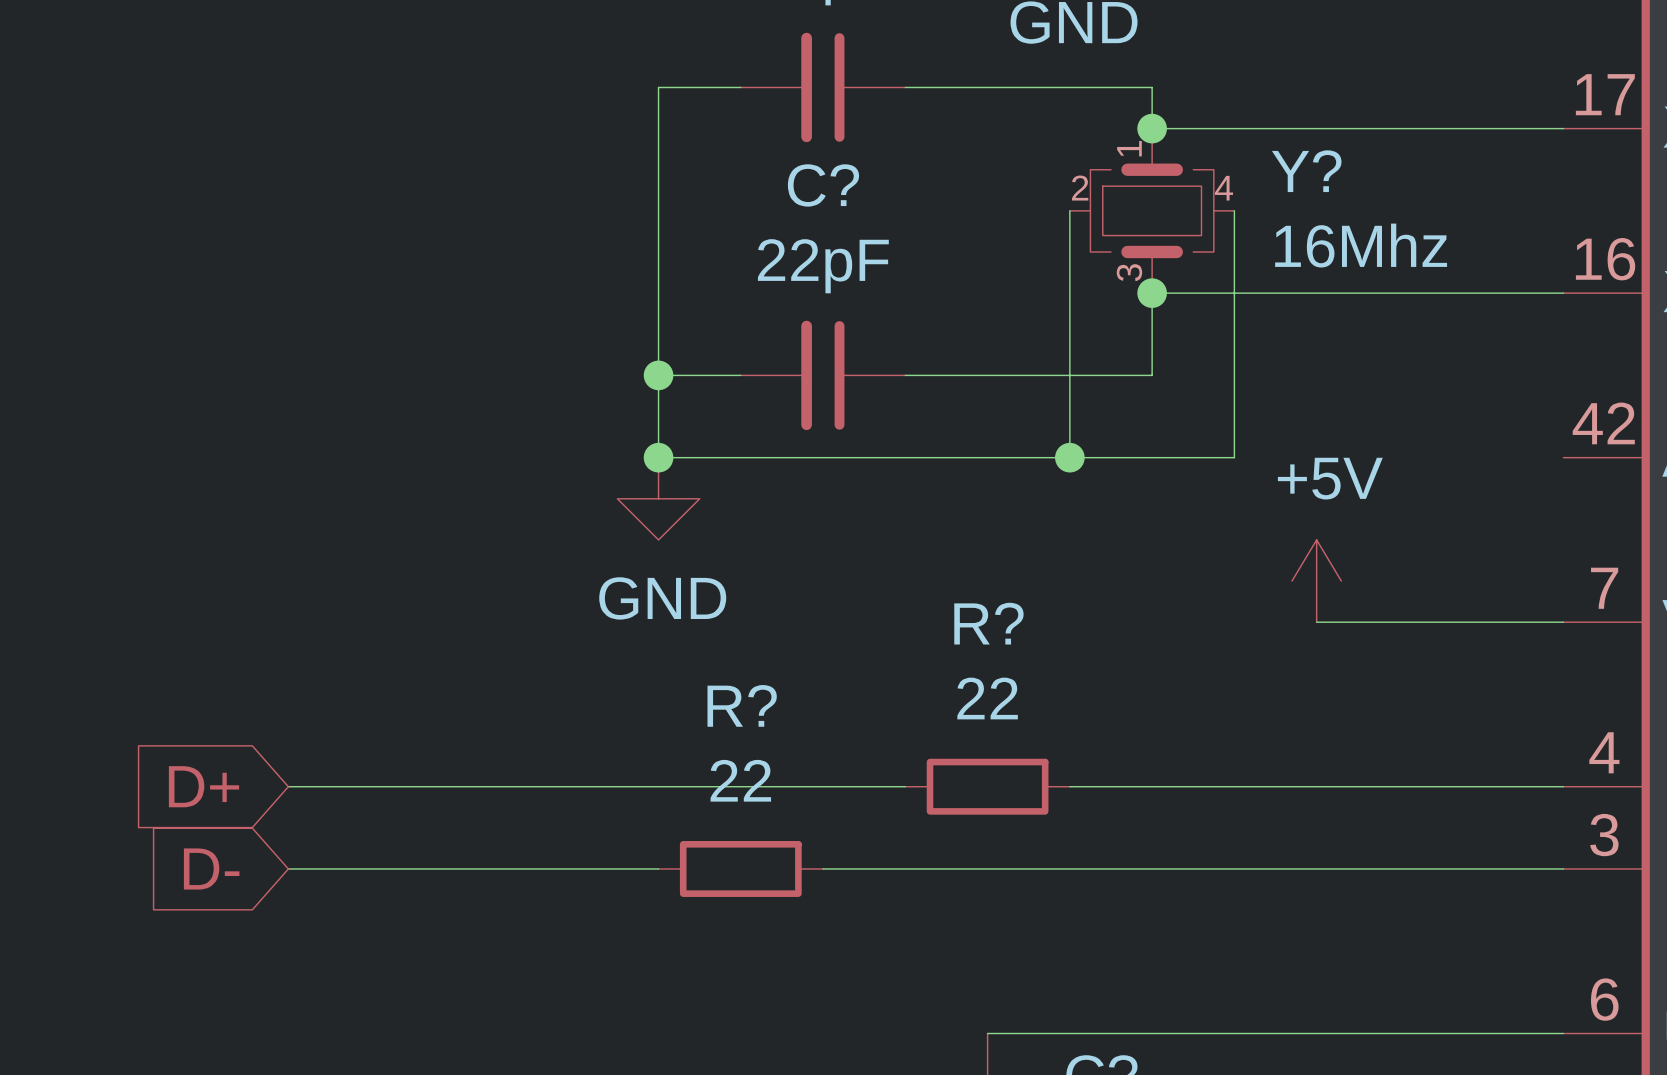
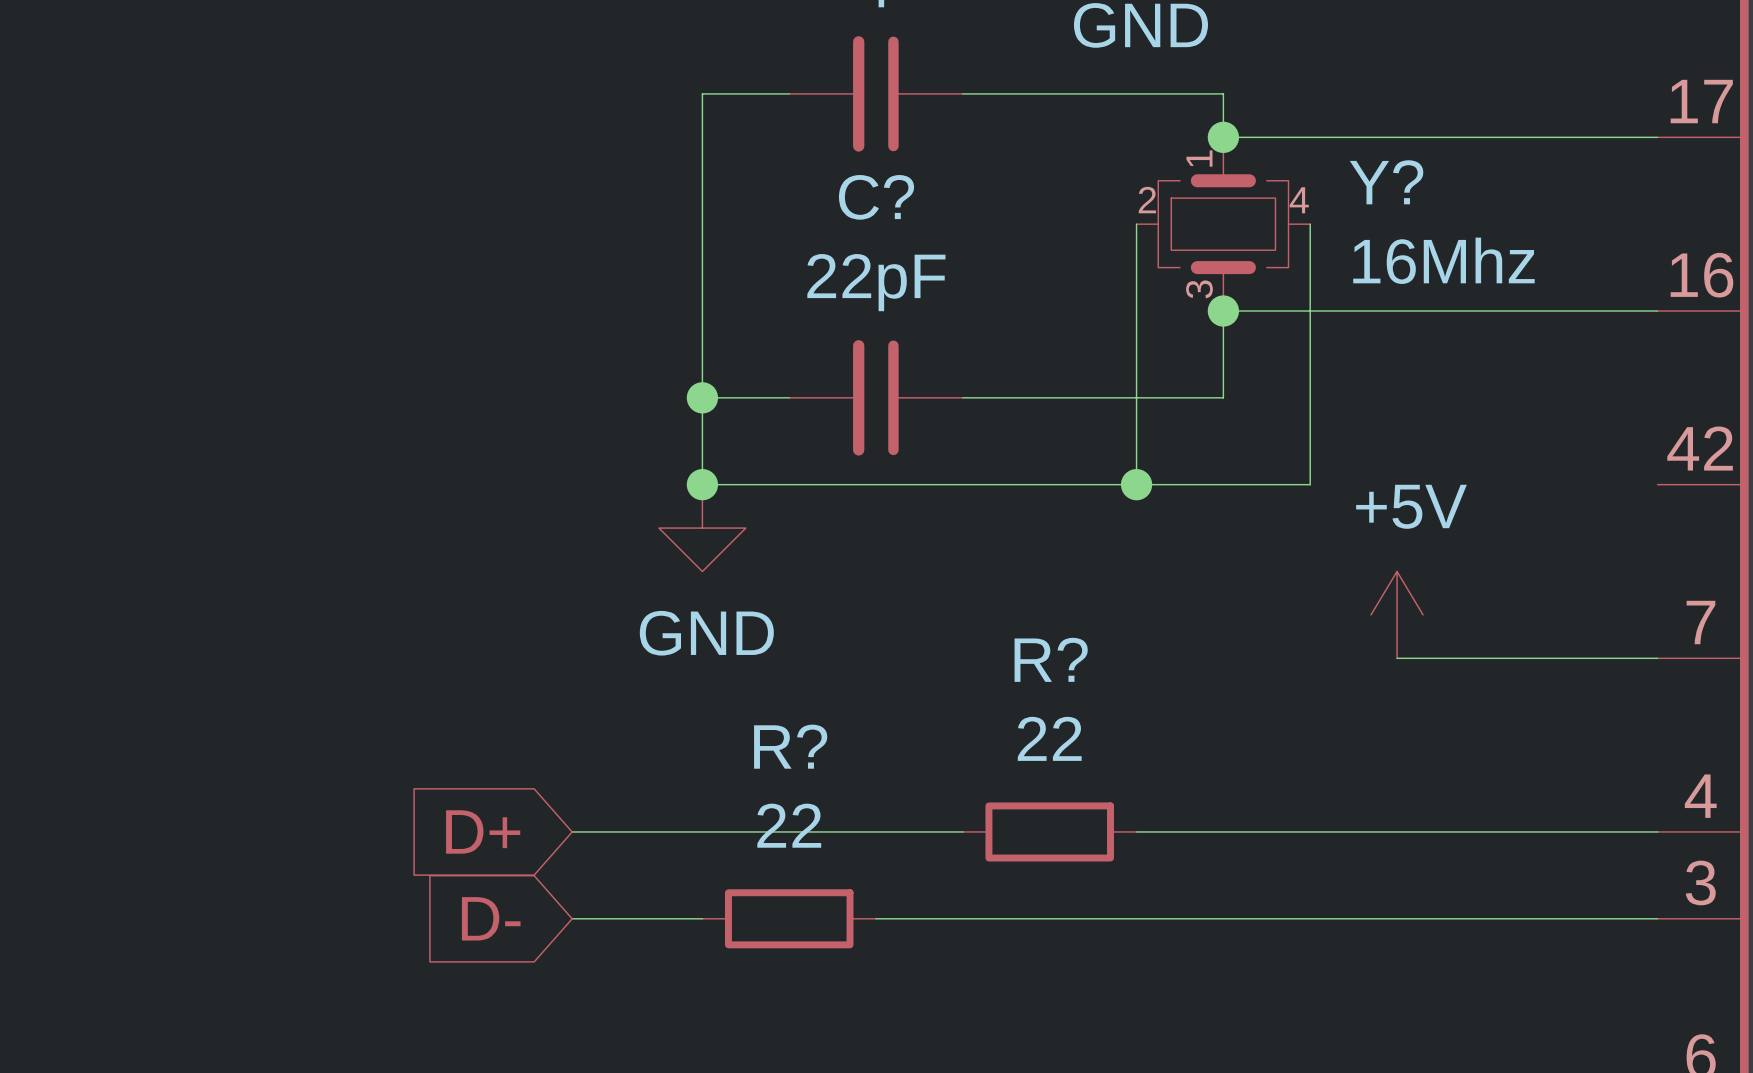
global label position: D+ (204, 786) -> D+ (483, 831)
wire: (288, 786) (535, 786) -> none
global label position: D- (211, 868) -> D- (491, 918)
wire: (288, 868) (535, 868) -> none

